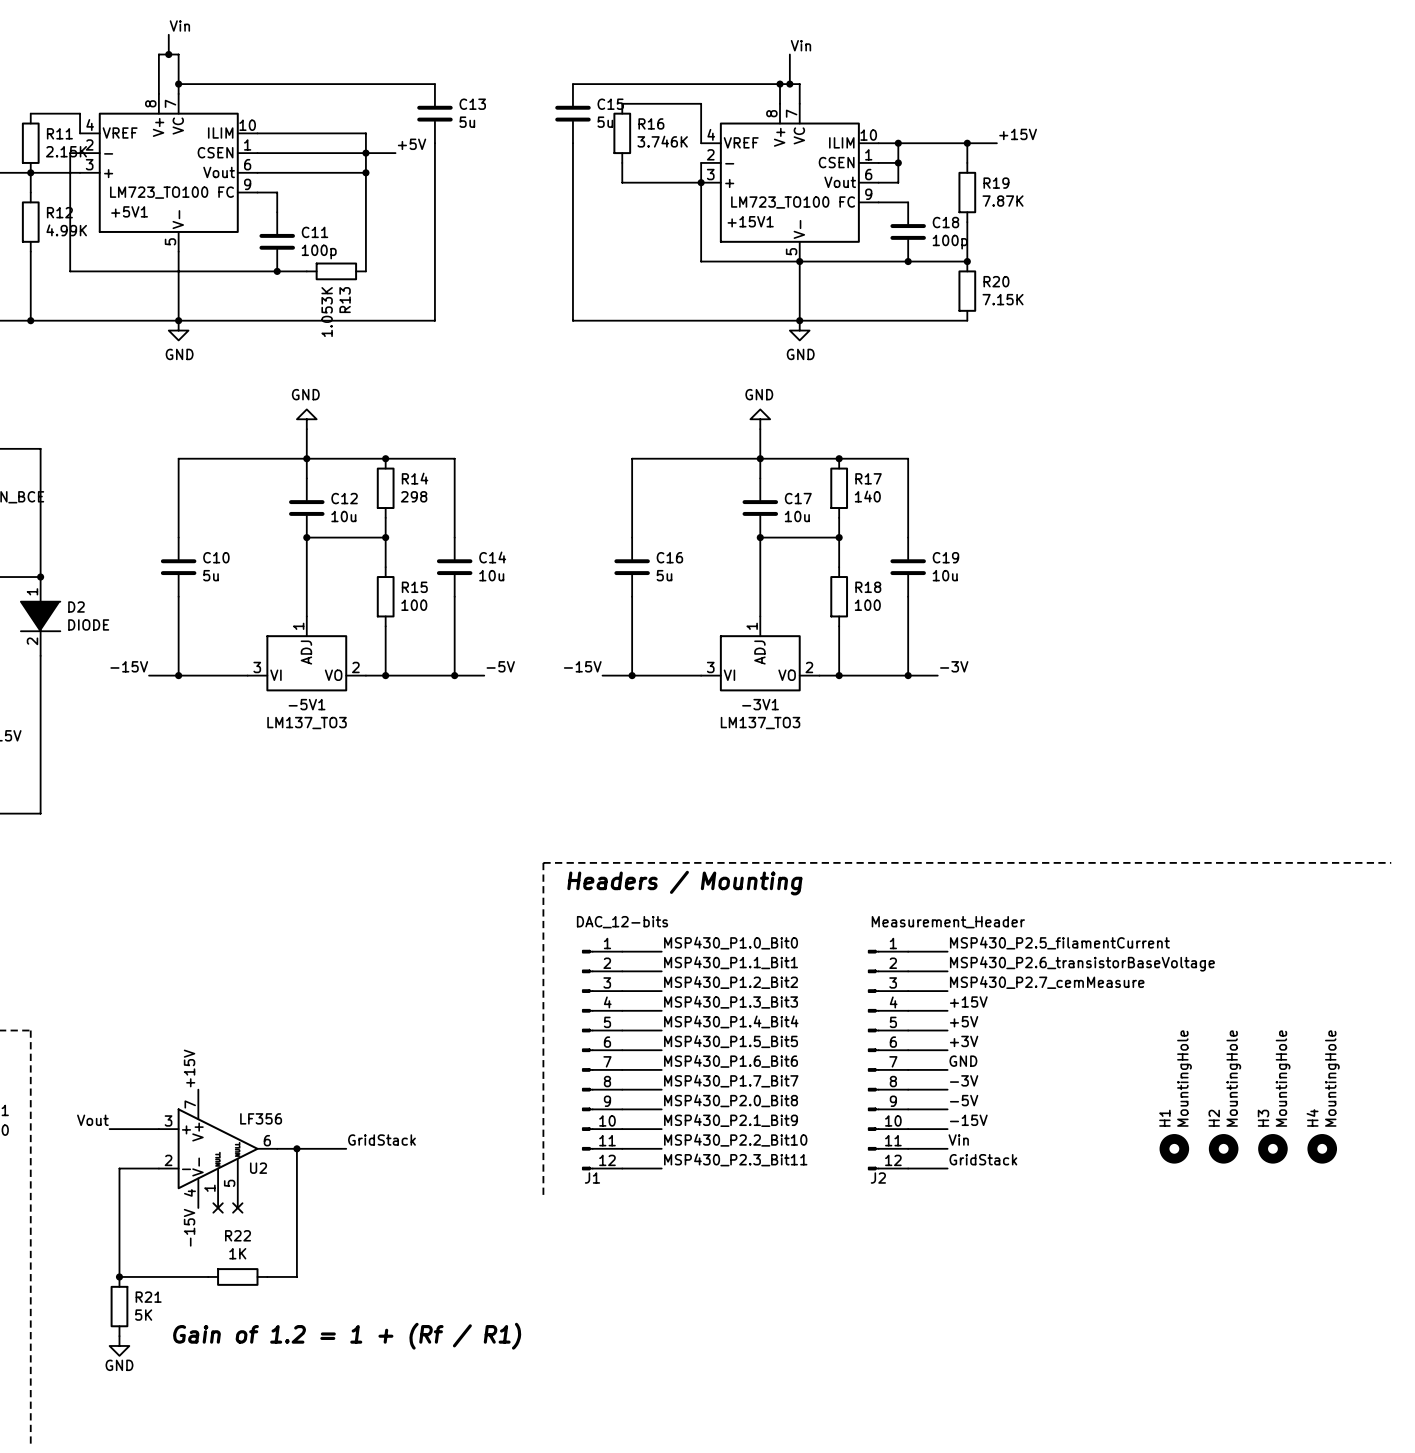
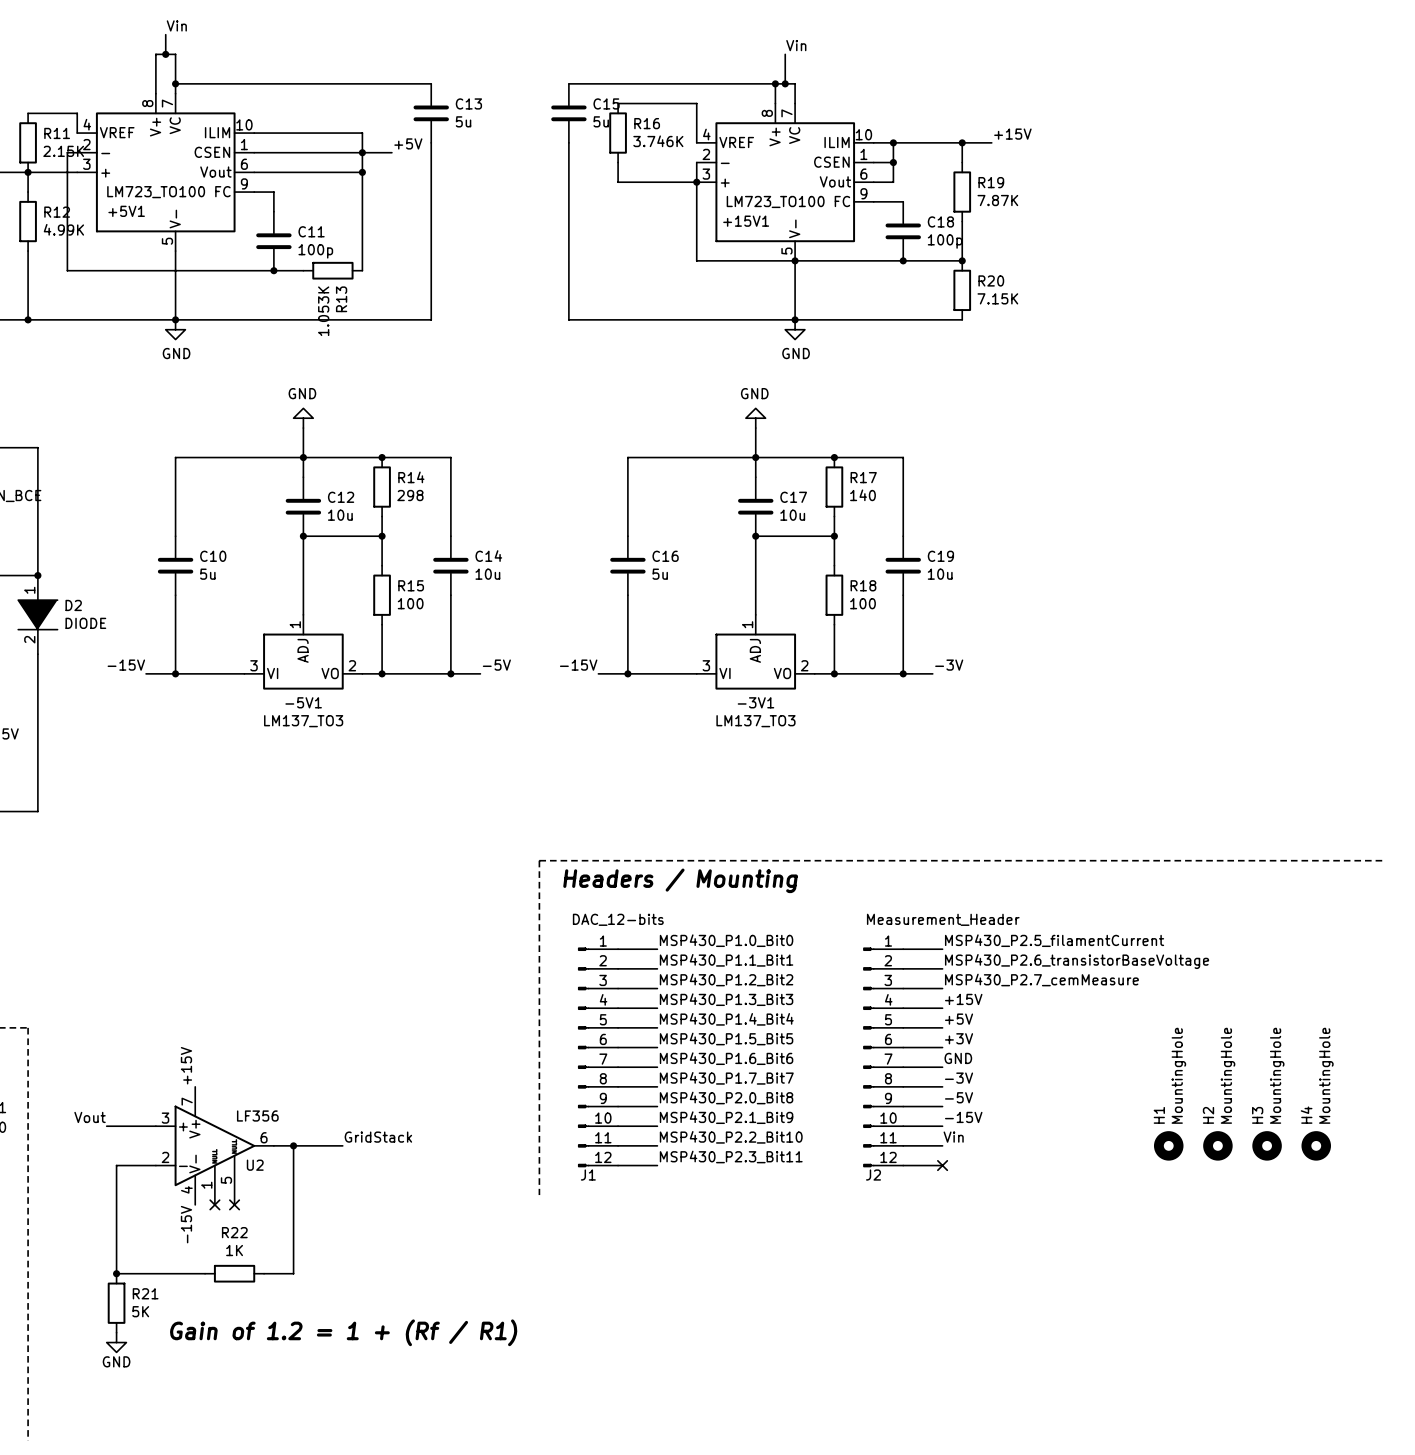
label: GridStack (983, 1159) -> none
no-connect mark: none -> (942, 1165)

